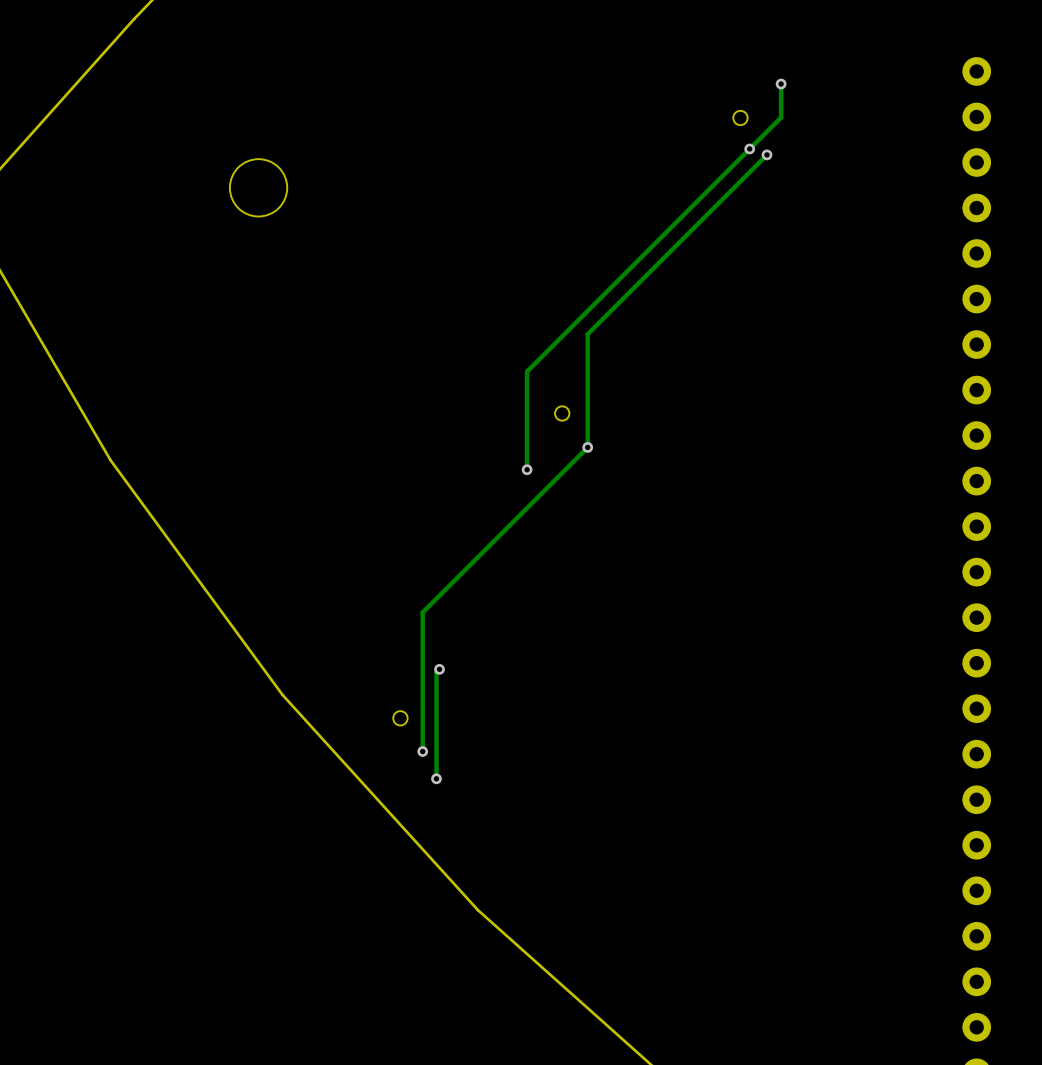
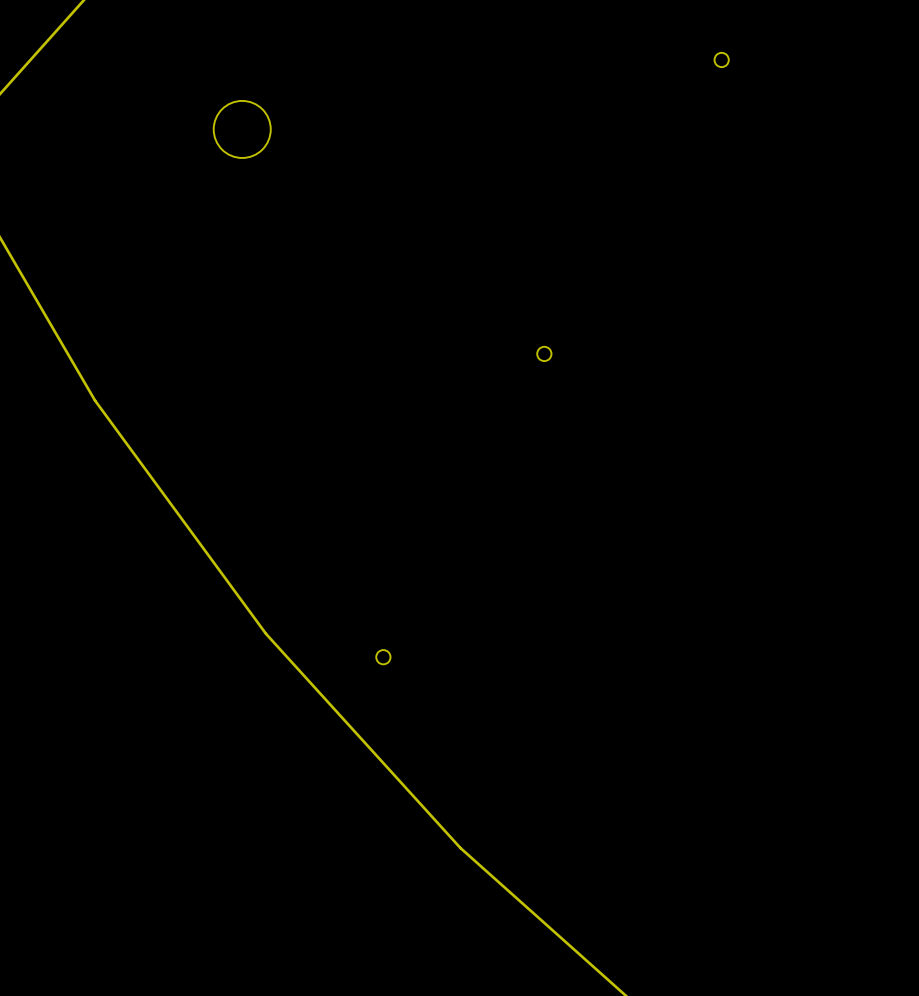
track: (781, 84) (781, 117) (527, 371) (527, 469) -> none
via: (781, 84) -> none
via: (749, 148) -> none
track: (766, 154) (587, 334) (587, 447) (422, 612) (422, 751) -> none
via: (766, 154) -> none
via: (587, 447) -> none
via: (527, 469) -> none
track: (439, 669) (436, 672) (436, 778) -> none
via: (439, 669) -> none
via: (422, 751) -> none
via: (436, 778) -> none

